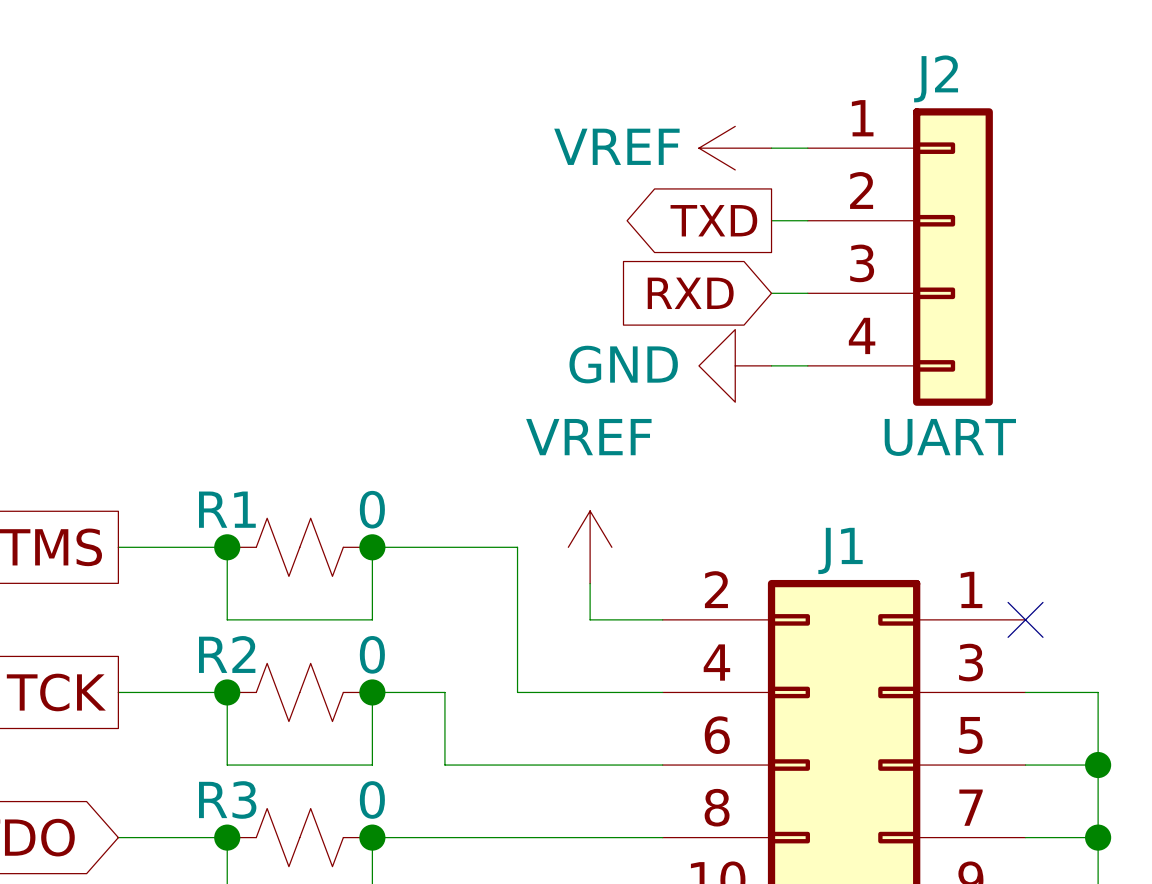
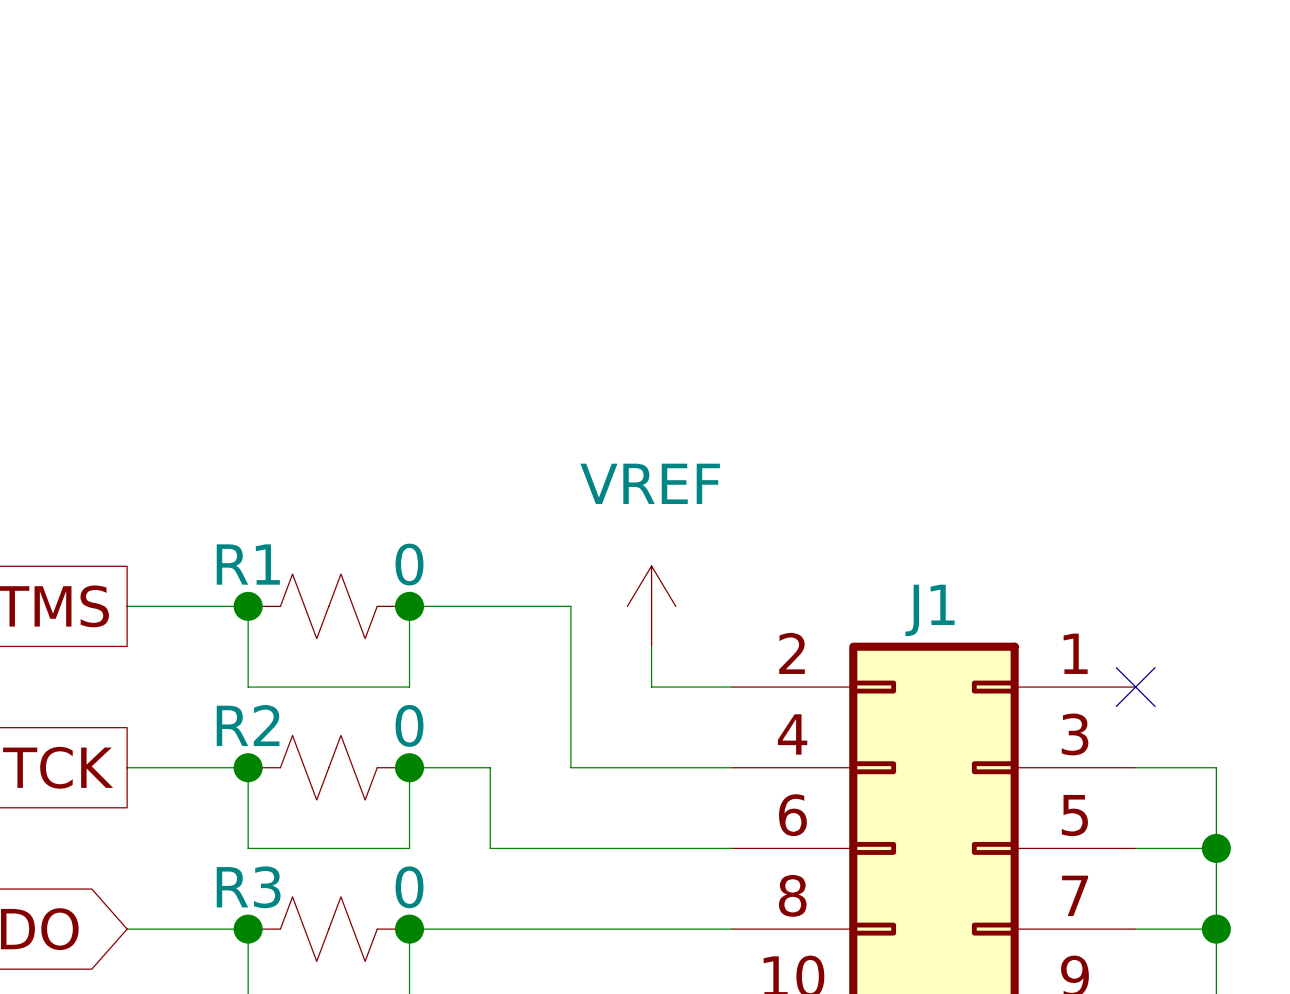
power symbol: VREF (735, 148) -> none
wire: (771, 148) (807, 148) -> none
global label: TXD (713, 220) -> none
wire: (771, 220) (807, 220) -> none
J2: UART (900, 257) -> none
global label: RXD (690, 293) -> none
wire: (771, 293) (807, 293) -> none
power symbol: GND (735, 365) -> none
wire: (771, 365) (807, 365) -> none

